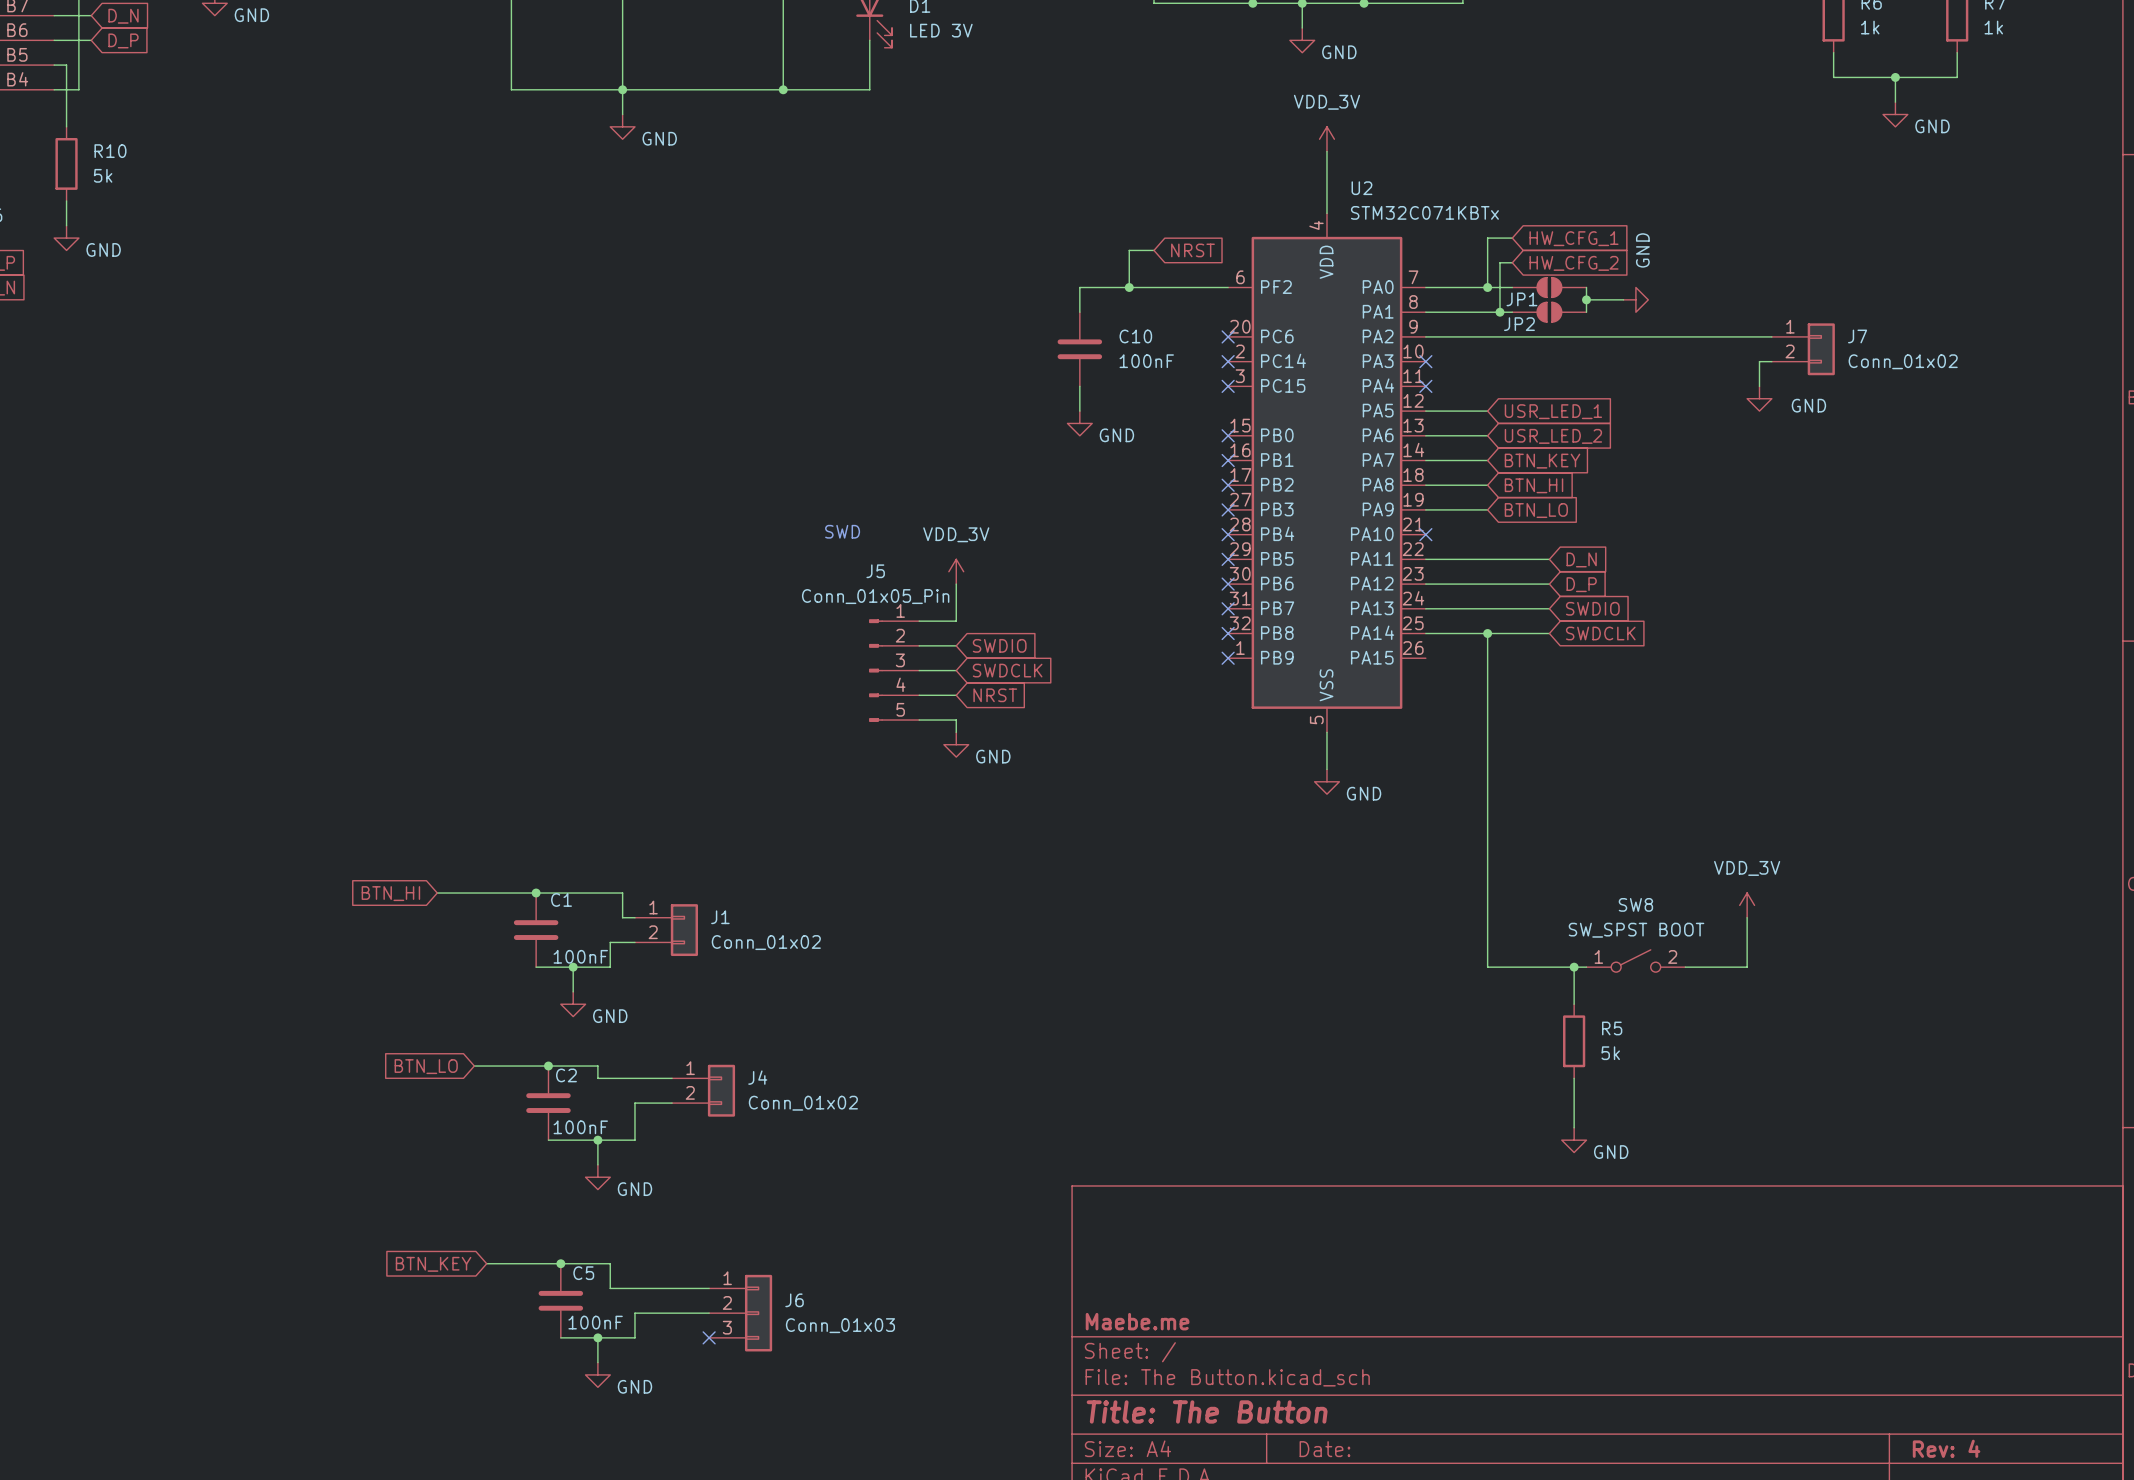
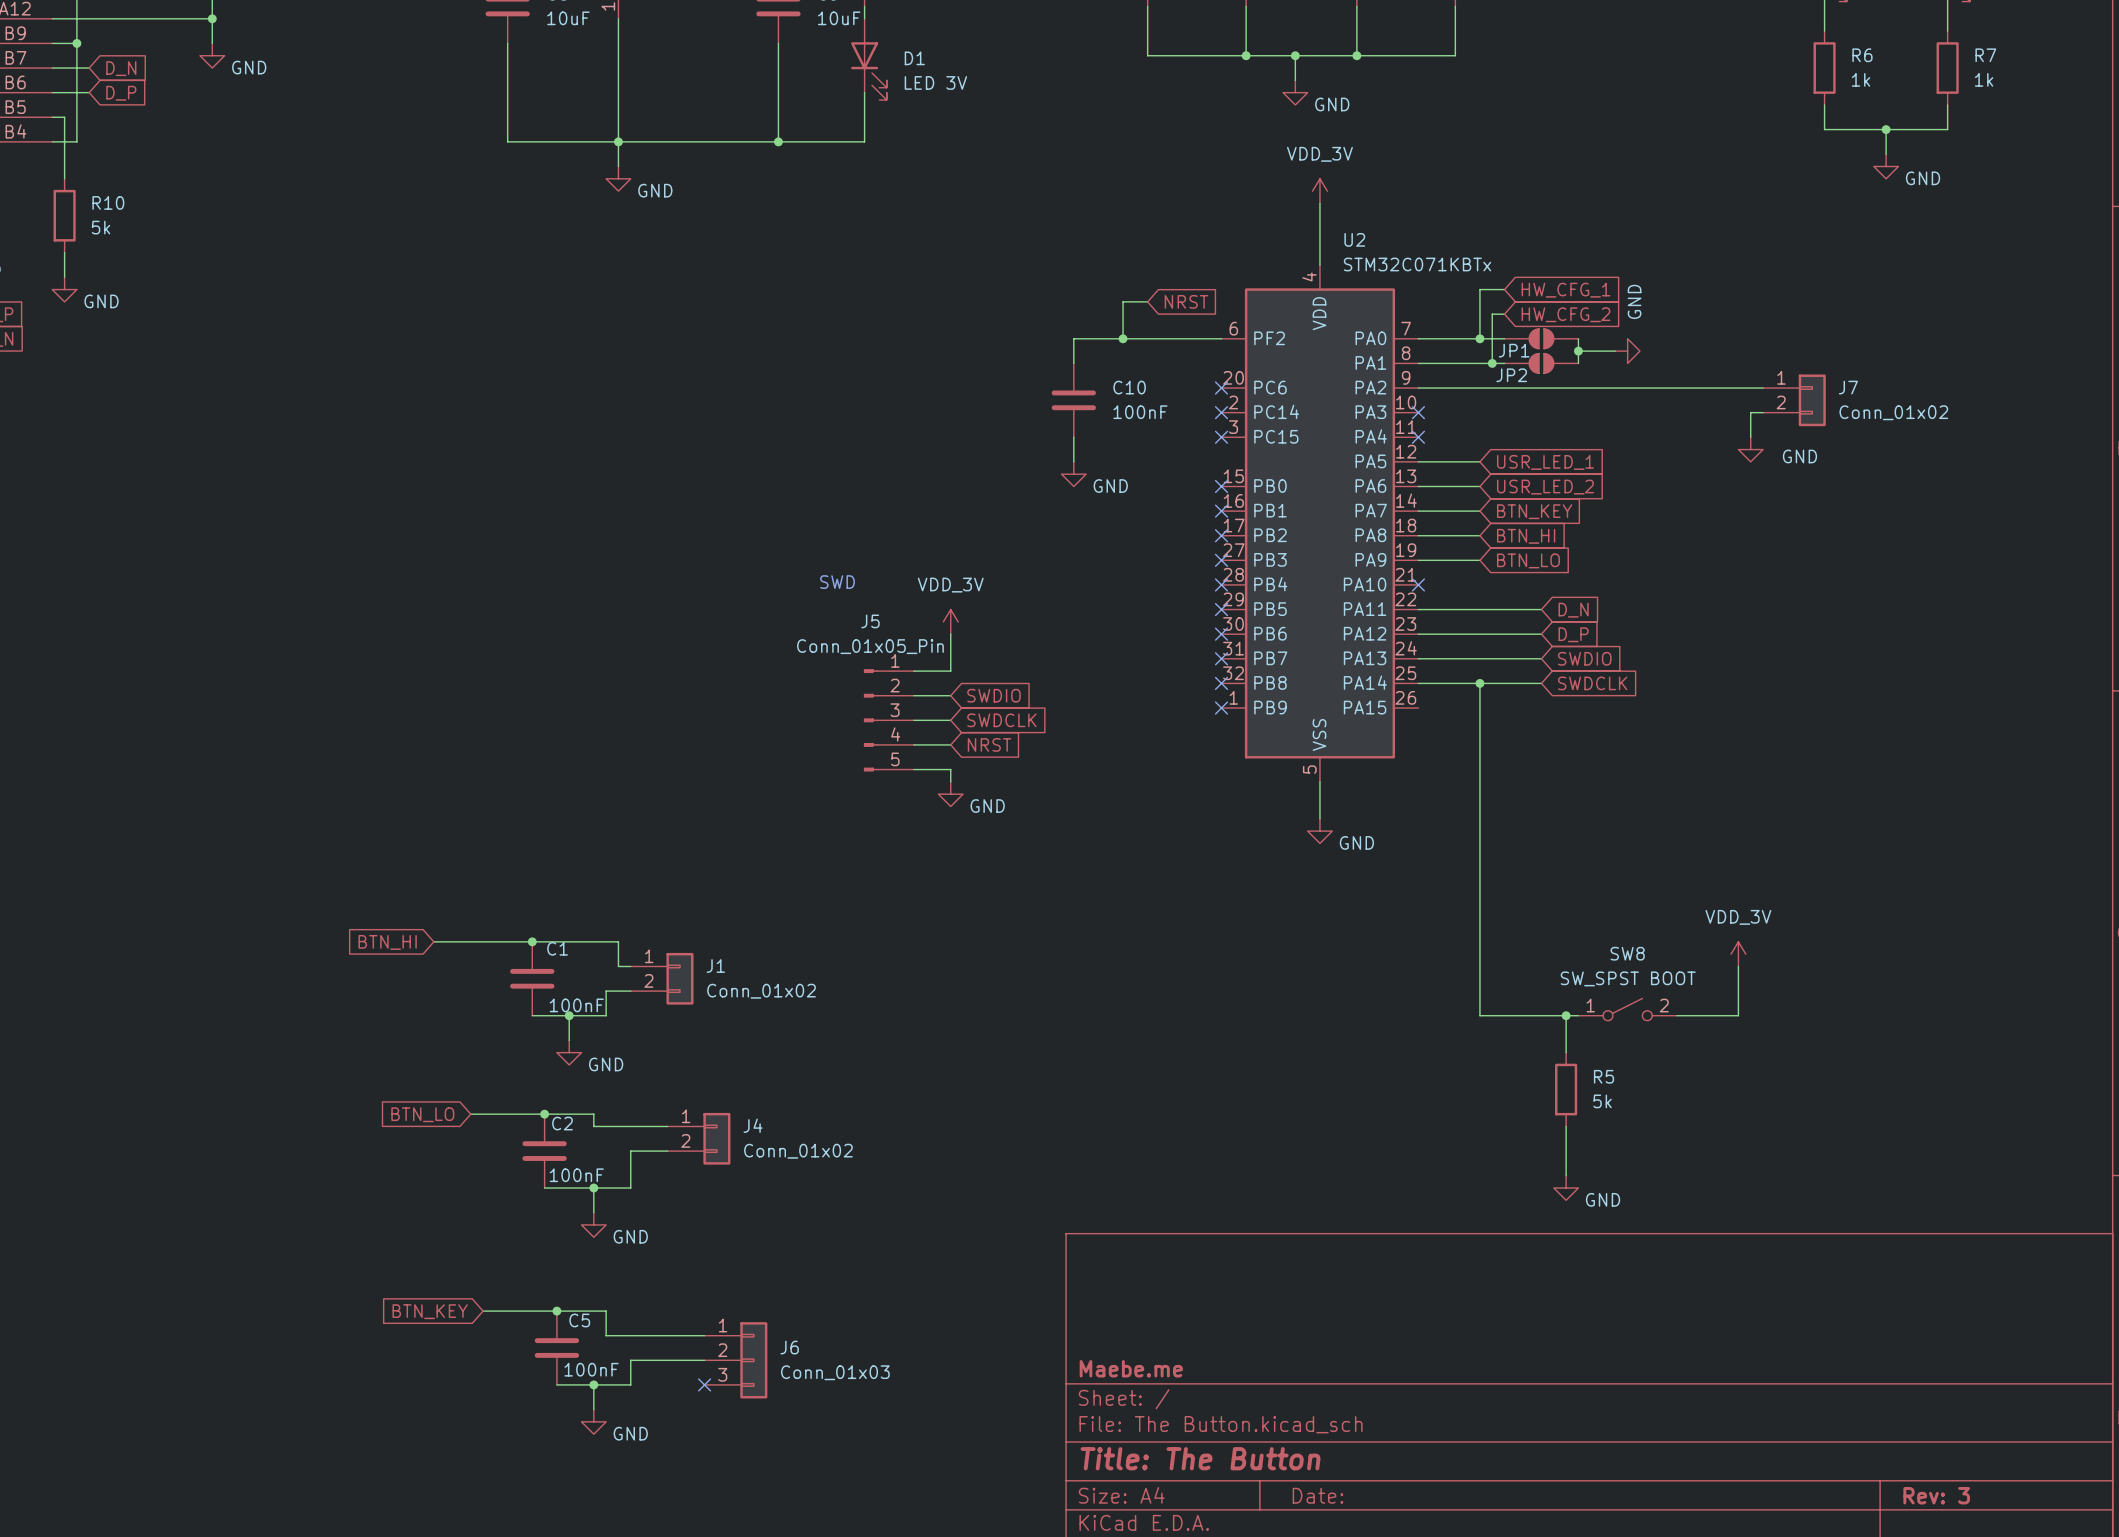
title block: Rev: 4 (1946, 1448) -> Rev: 3 (1936, 1495)

